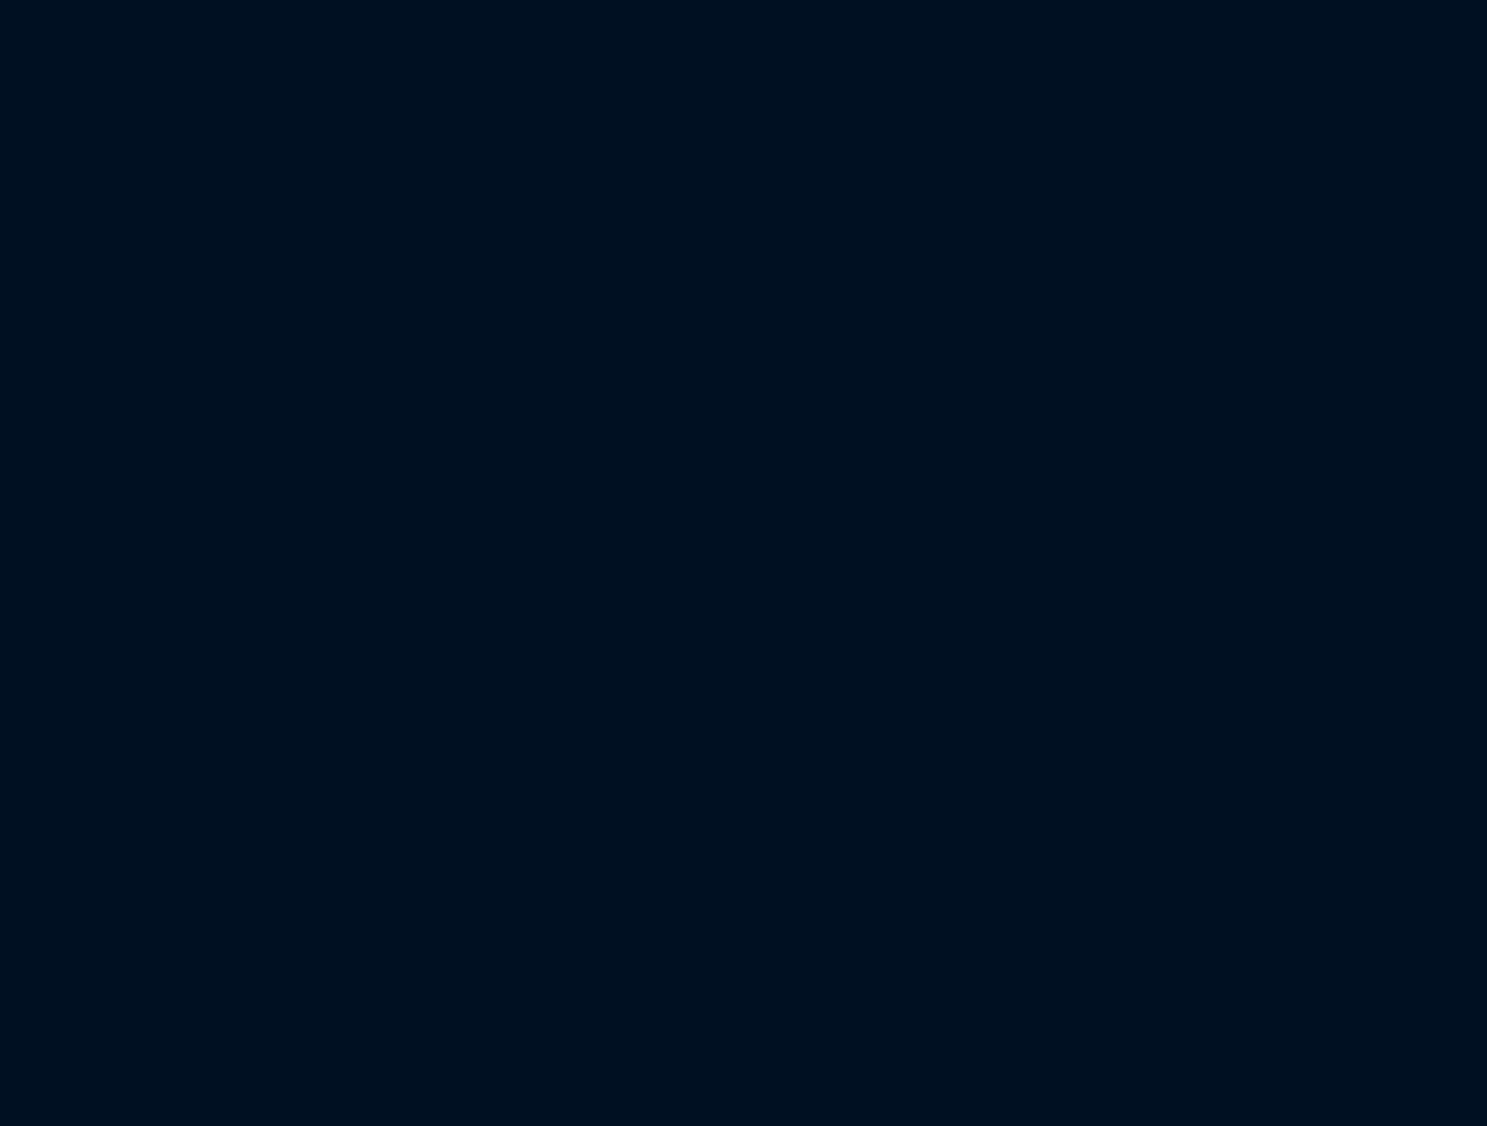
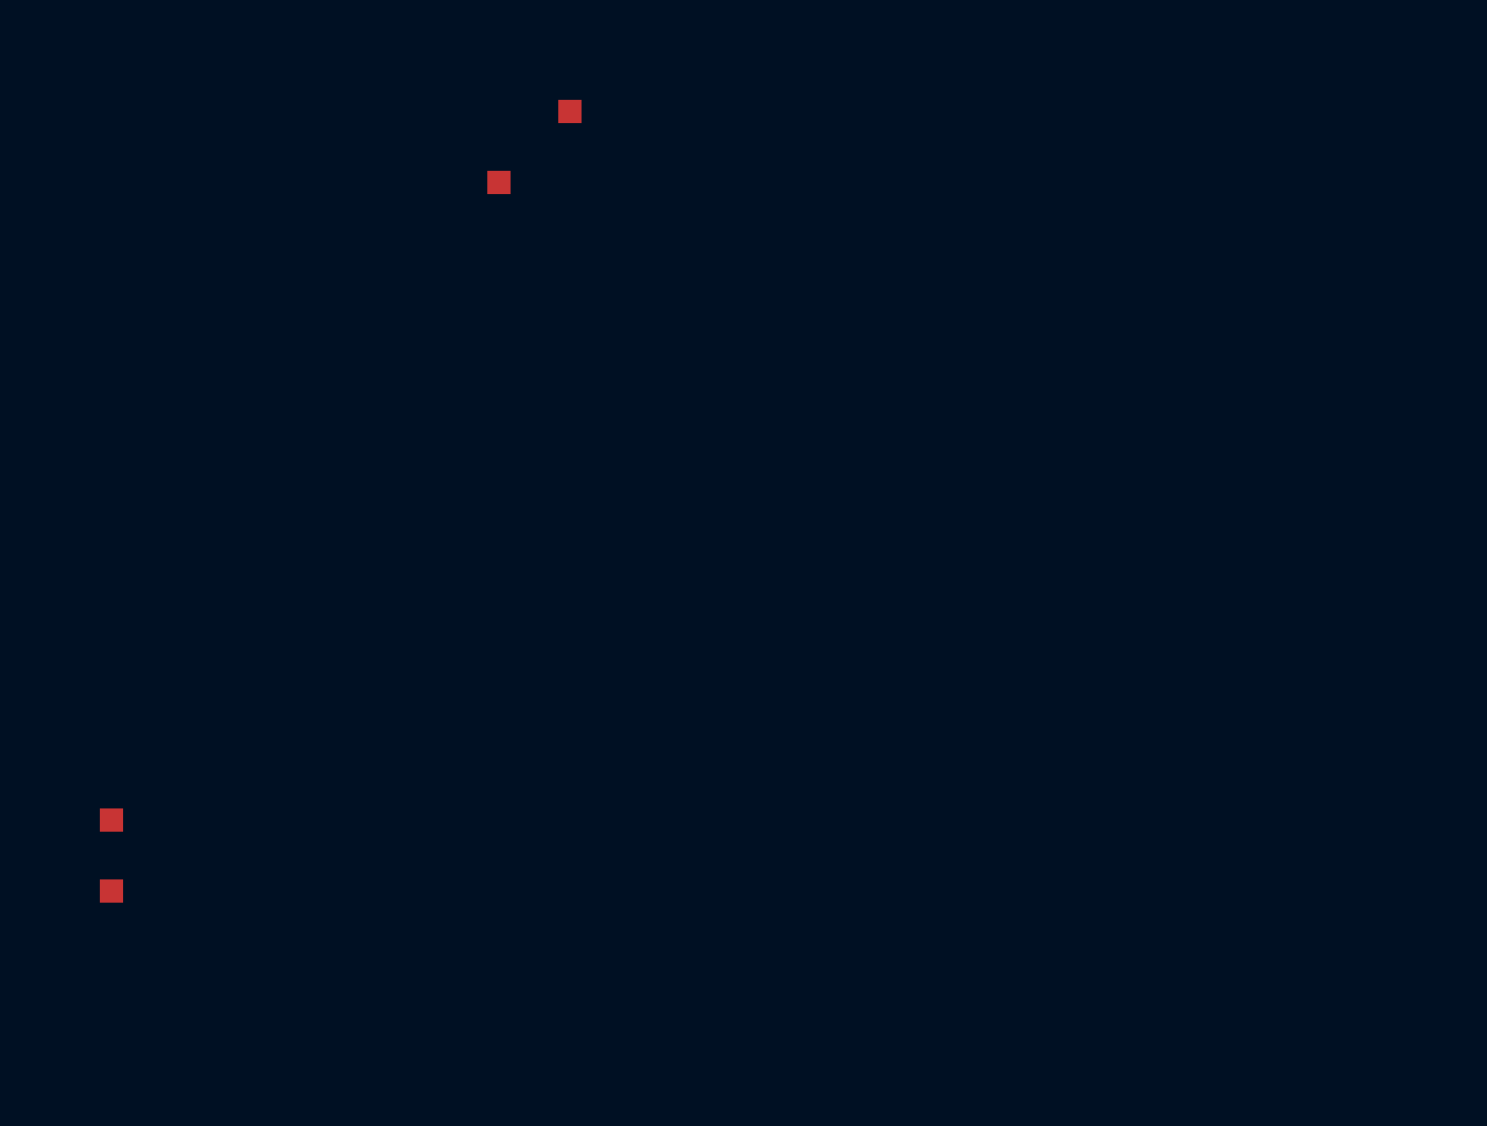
part: none -> (569, 111)
part: none -> (498, 182)
part: none -> (111, 820)
part: none -> (111, 891)

